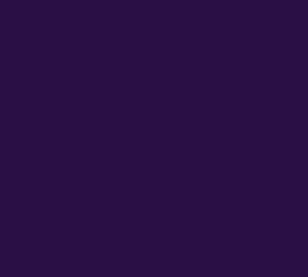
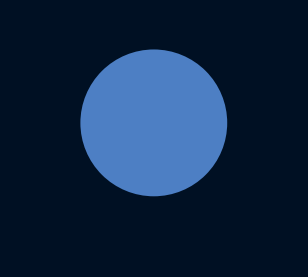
part: none -> (153, 122)

